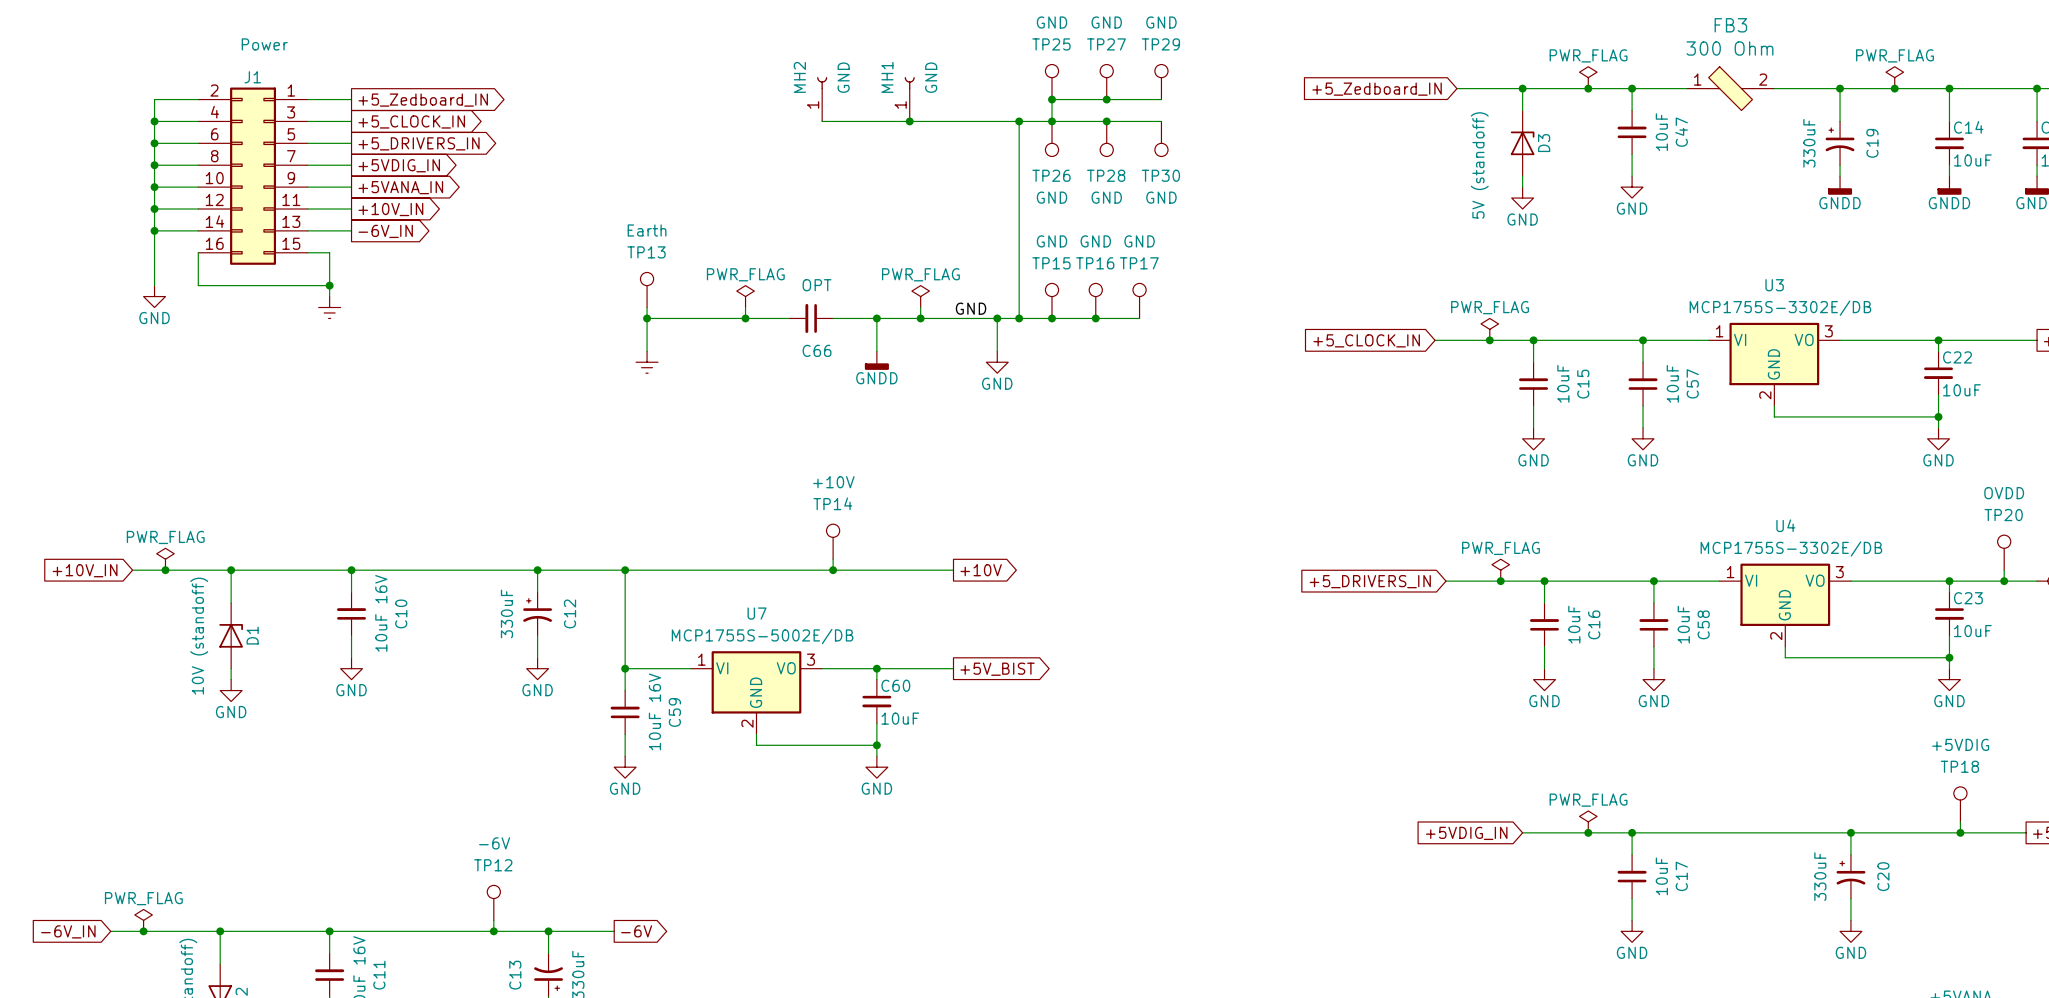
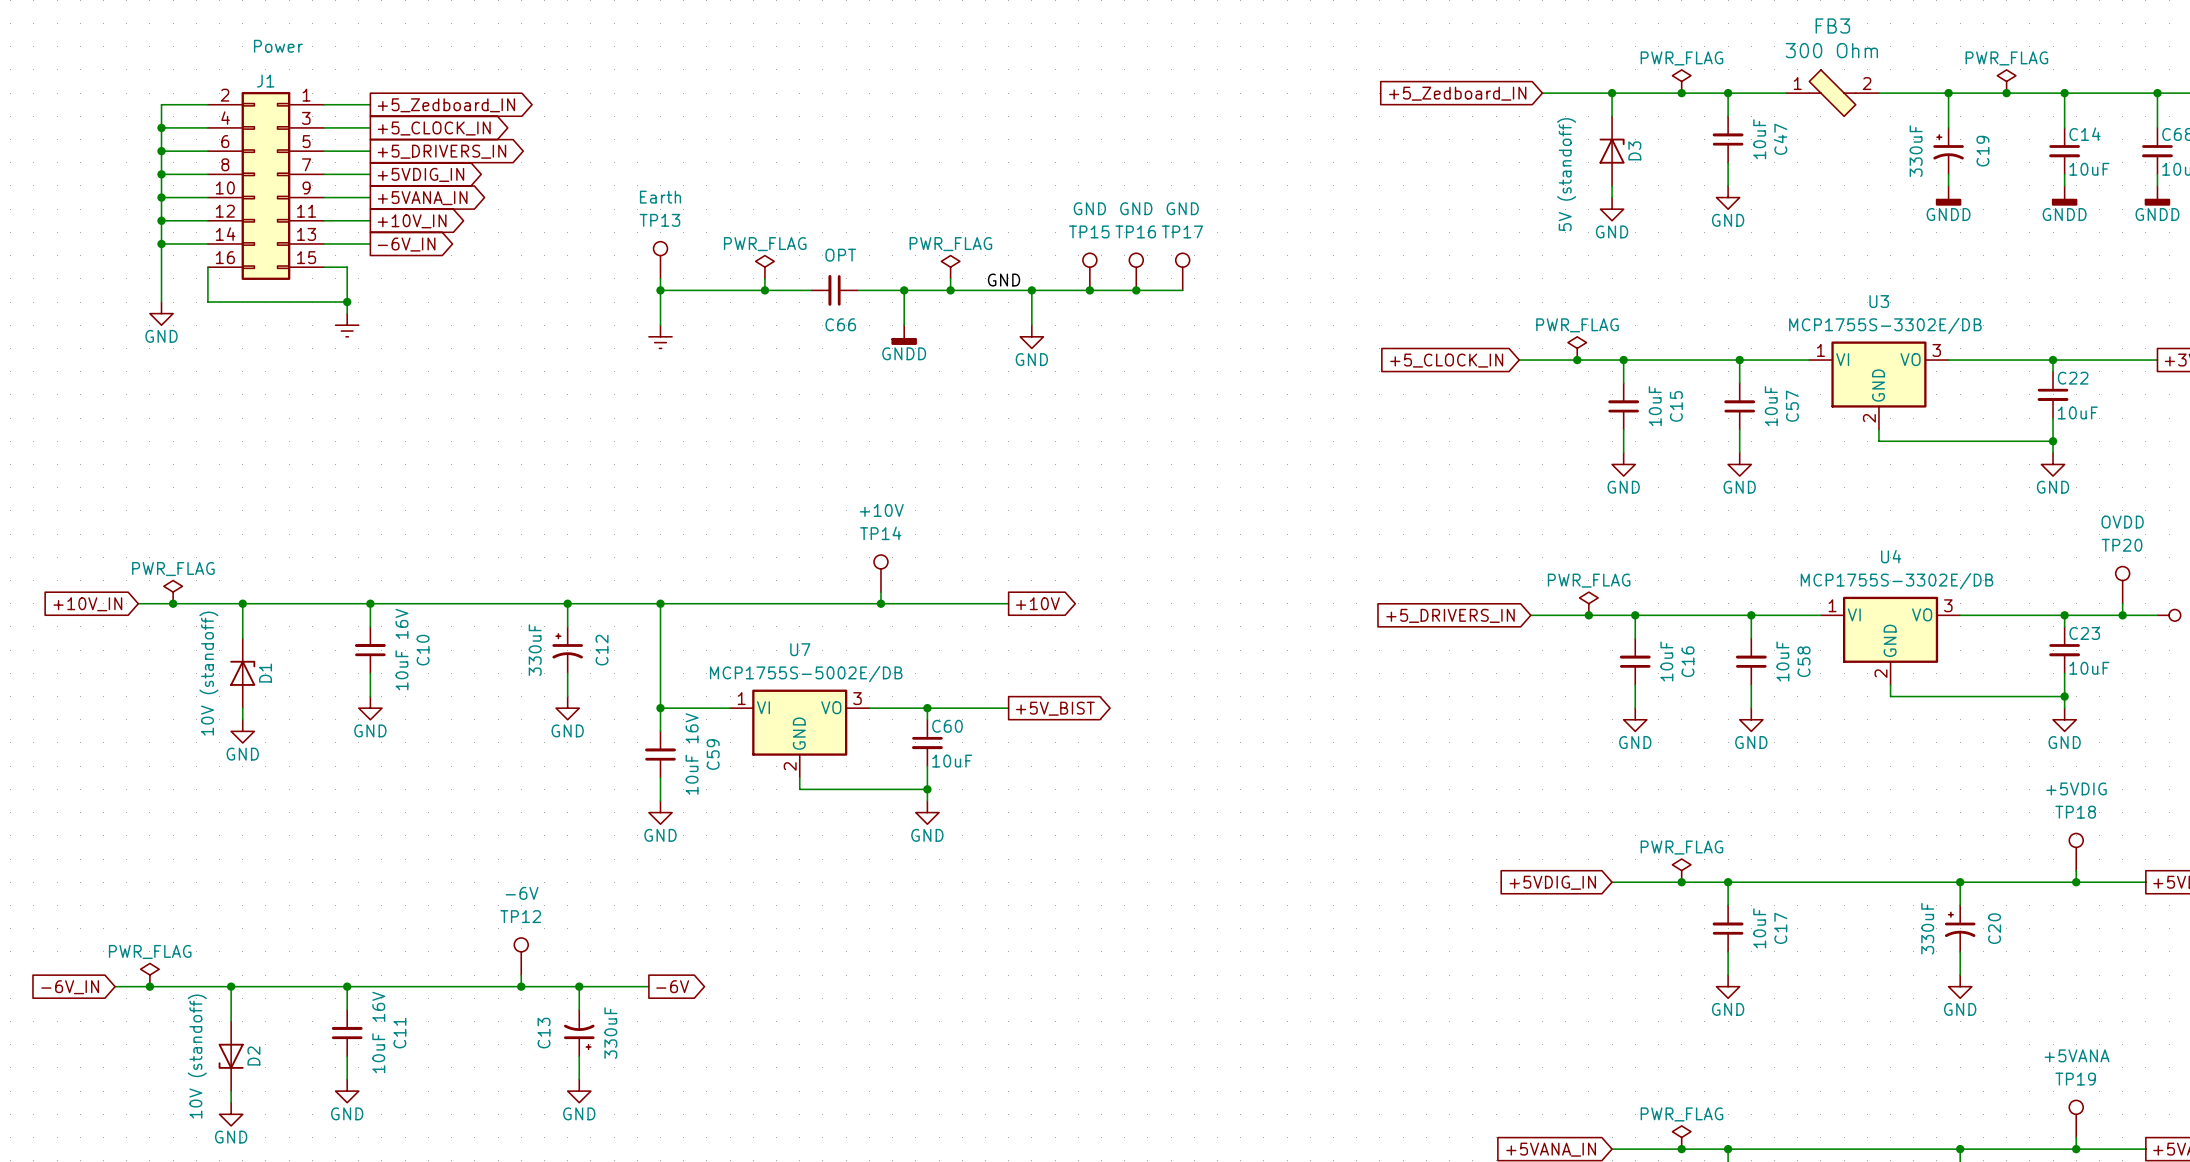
TP25: GND (1052, 82) -> none
TP27: GND (1106, 82) -> none
TP29: GND (1161, 82) -> none
MH2: GND (822, 99) -> none
MH1: GND (909, 99) -> none
junction: (1052, 99) -> none
junction: (1106, 99) -> none
wire: (1161, 99) (1052, 99) (1052, 121) -> none
wire: (822, 121) (1161, 121) -> none
junction: (909, 121) -> none
wire: (1019, 121) (1019, 318) -> none
junction: (1019, 121) -> none
junction: (1052, 121) -> none
junction: (1106, 121) -> none
TP26: GND (1052, 138) -> none
TP28: GND (1106, 138) -> none
TP30: GND (1161, 138) -> none
junction: none -> (660, 290)
junction: none -> (764, 290)
junction: none -> (904, 290)
junction: none -> (950, 290)
junction: none -> (1031, 290)
junction: none -> (1089, 290)
junction: none -> (1136, 290)
TP13 position: (647, 289) -> (660, 260)
power symbol position: PWR_FLAG (745, 296) -> PWR_FLAG (764, 267)
power symbol position: PWR_FLAG (920, 296) -> PWR_FLAG (950, 267)
TP15 position: (1052, 300) -> (1089, 271)
TP16 position: (1095, 300) -> (1136, 271)
TP17 position: (1139, 300) -> (1182, 271)
wire: (647, 307) (647, 351) -> (660, 278) (660, 325)
wire: (745, 307) (745, 318) -> (764, 278) (764, 290)
wire: (920, 307) (920, 318) -> (950, 278) (950, 290)
label position: GND (971, 308) -> GND (1004, 280)
wire: (647, 318) (789, 318) -> (660, 290) (811, 290)
junction: (647, 318) -> none
junction: (745, 318) -> none
C66 position: (811, 318) -> (834, 290)
wire: (833, 318) (1139, 318) -> (857, 290) (1182, 290)
wire: (876, 318) (876, 351) -> (904, 290) (904, 325)
junction: (876, 318) -> none
junction: (920, 318) -> none
wire: (997, 318) (997, 351) -> (1031, 290) (1031, 325)
junction: (997, 318) -> none
junction: (1019, 318) -> none
junction: (1052, 318) -> none
junction: (1095, 318) -> none
power symbol position: GNDD (876, 360) -> GNDD (904, 335)
power symbol position: (647, 362) -> (660, 336)
power symbol position: GND (997, 362) -> GND (1031, 336)

